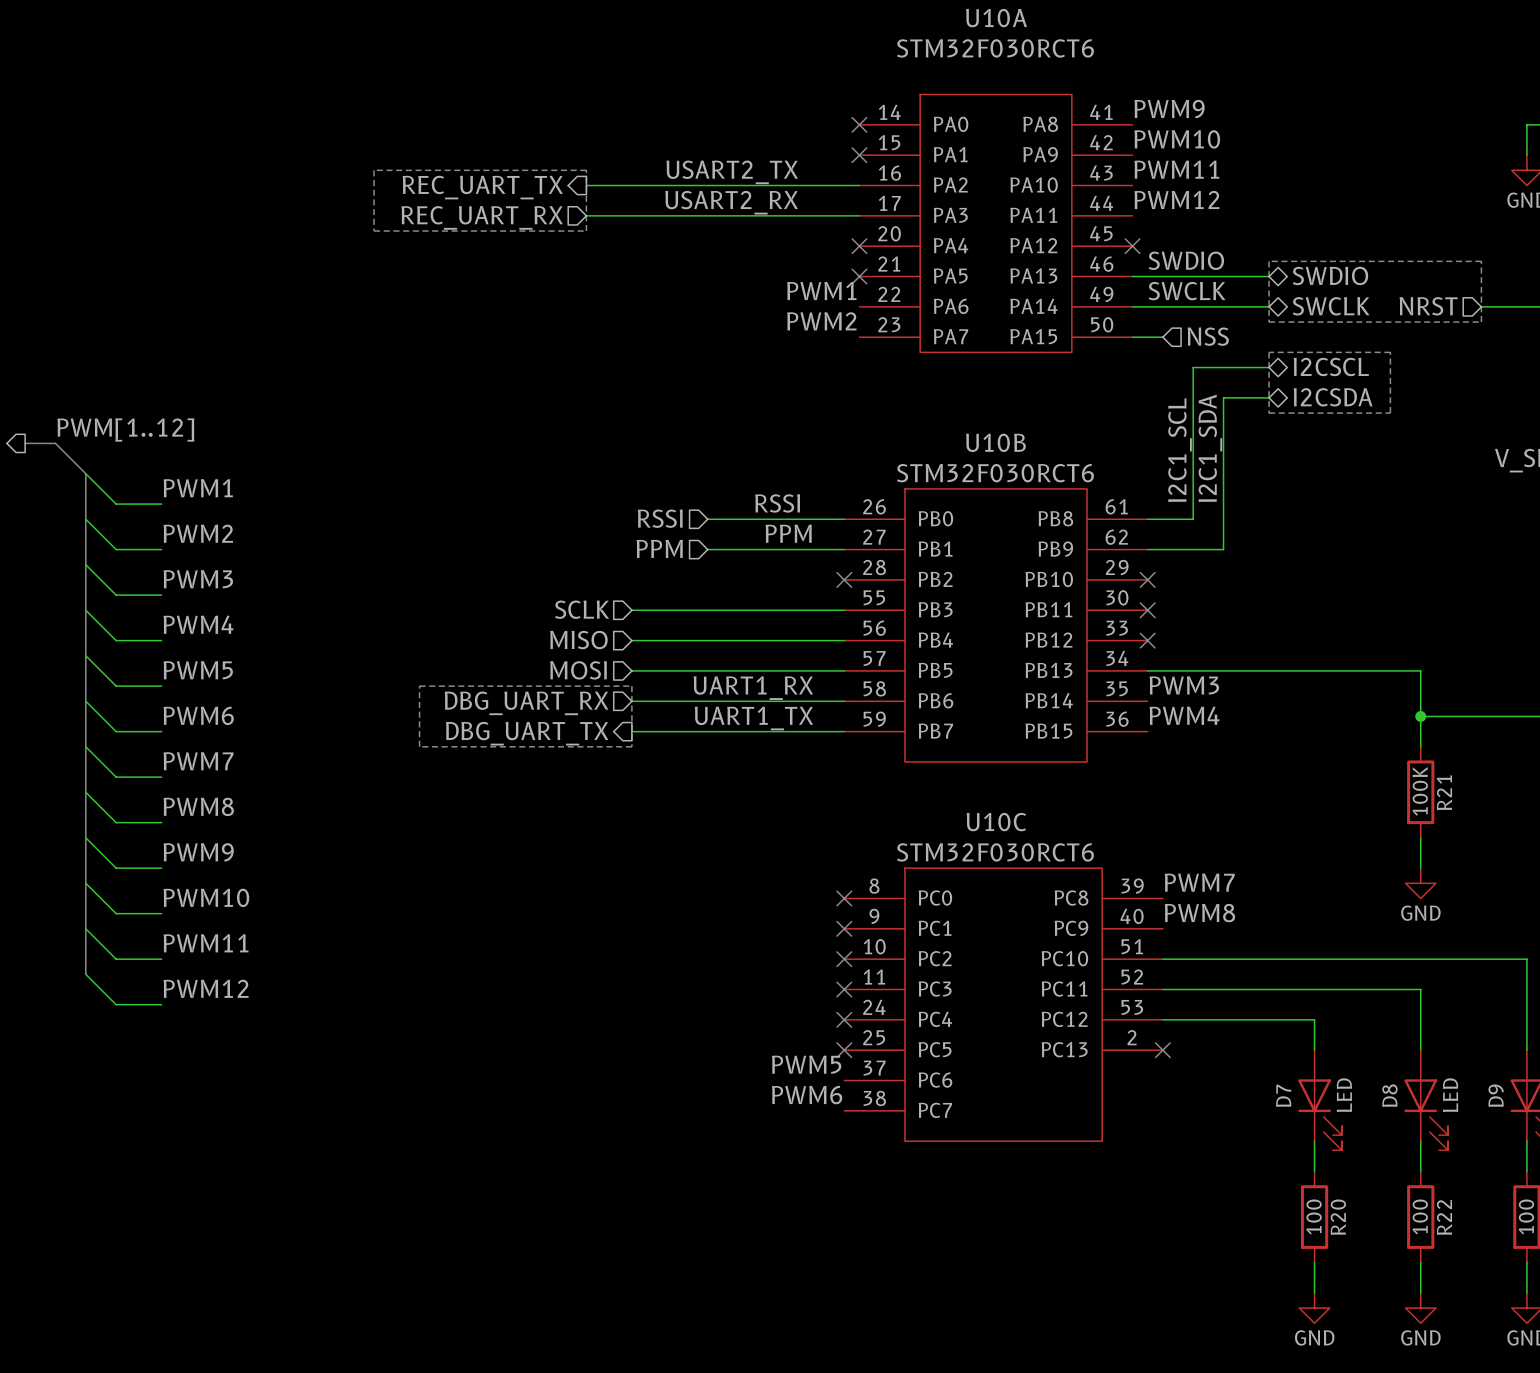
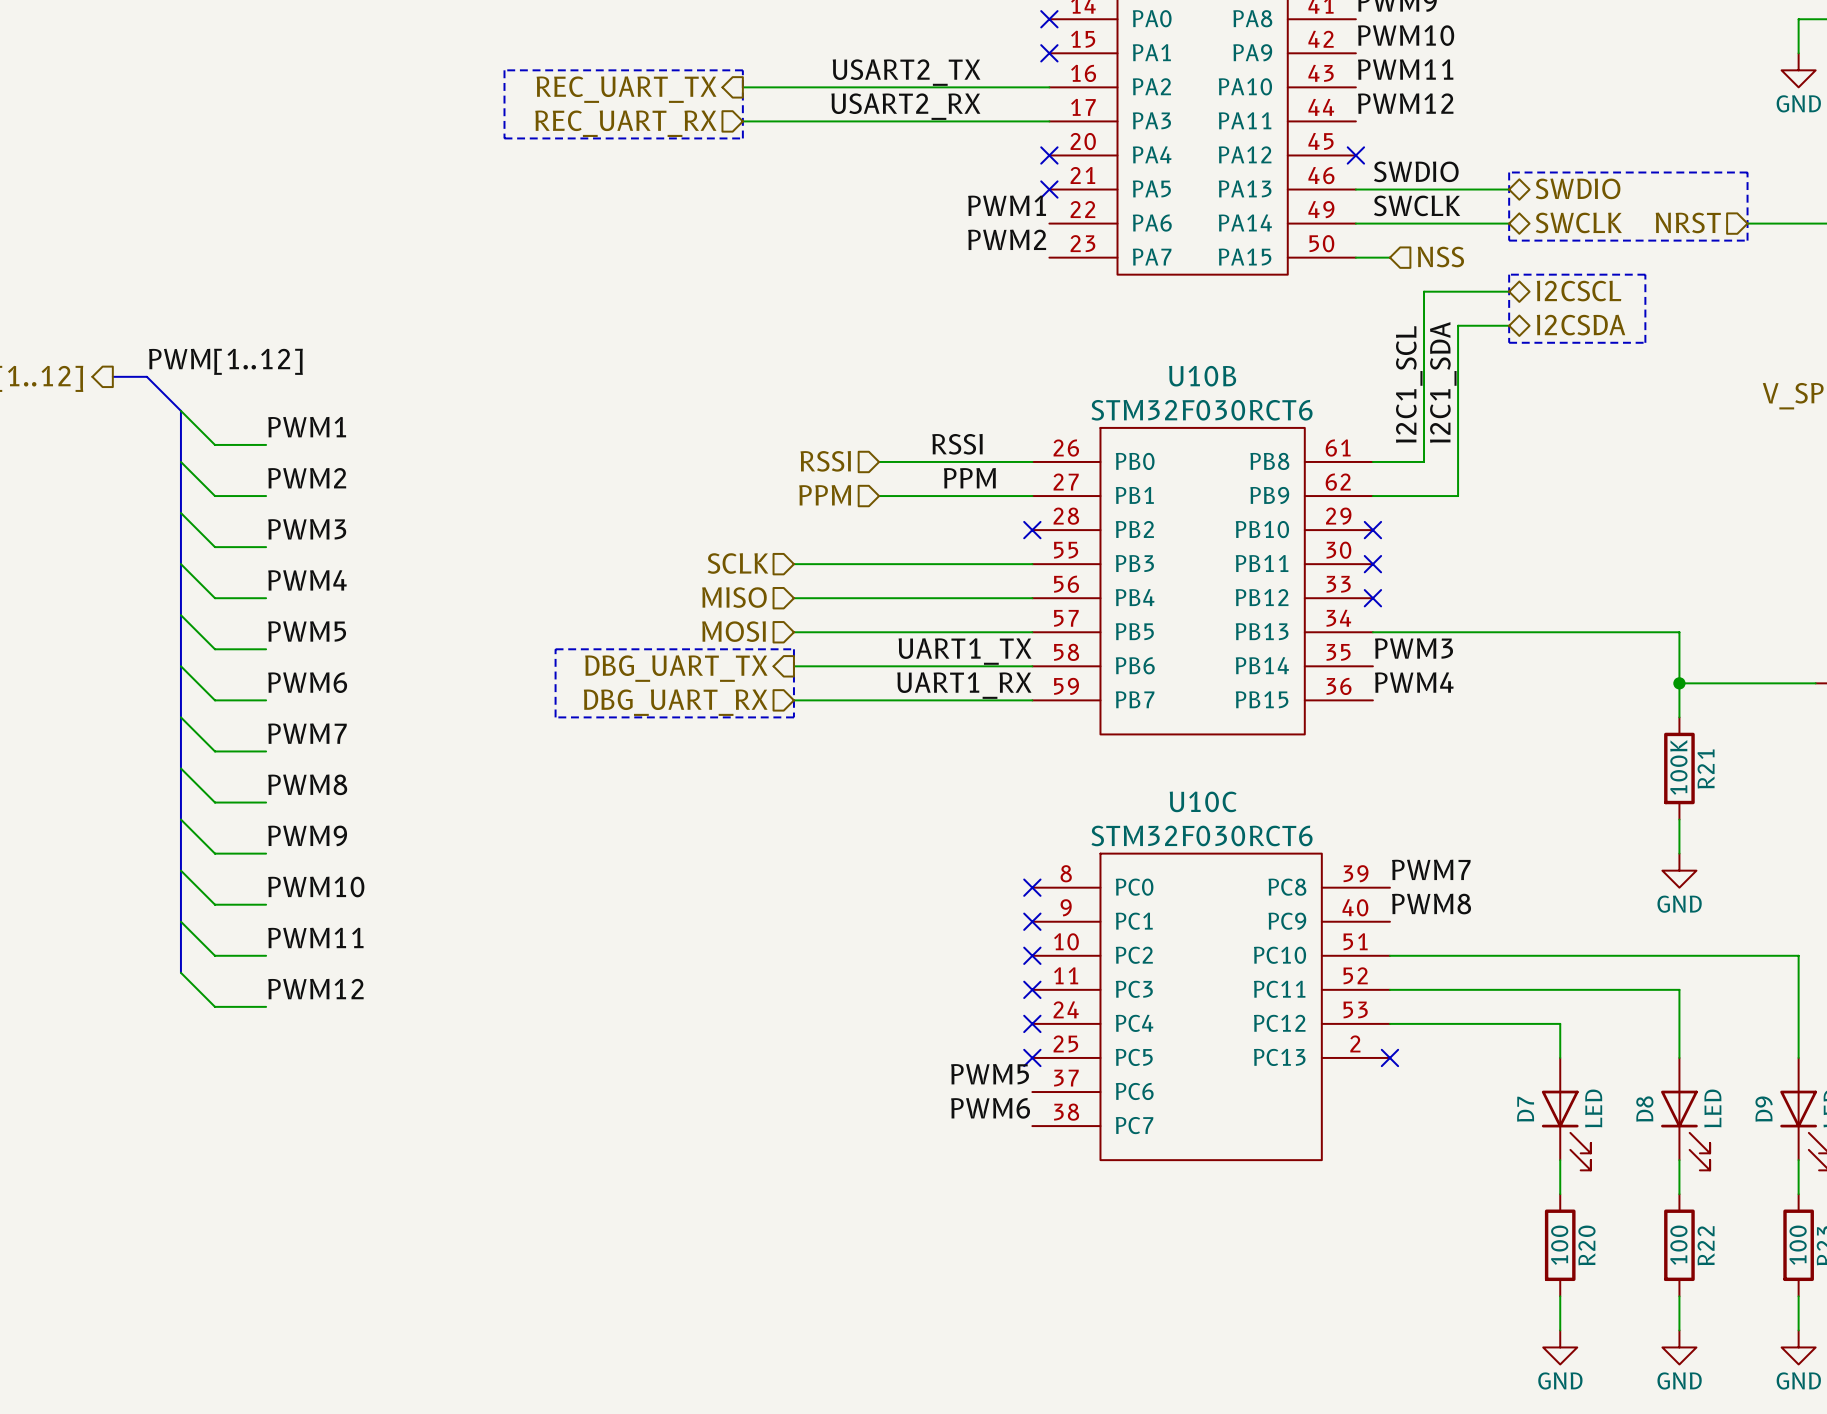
label position: UART1_RX (753, 688) -> UART1_RX (964, 685)
hierarchical label shape: input (526, 703) -> output (676, 668)
hierarchical label: DBG_UART_RX (526, 703) -> DBG_UART_TX (676, 668)
label position: UART1_TX (753, 718) -> UART1_TX (965, 651)
hierarchical label shape: output (527, 733) -> input (675, 702)
hierarchical label: DBG_UART_TX (527, 733) -> DBG_UART_RX (675, 702)

